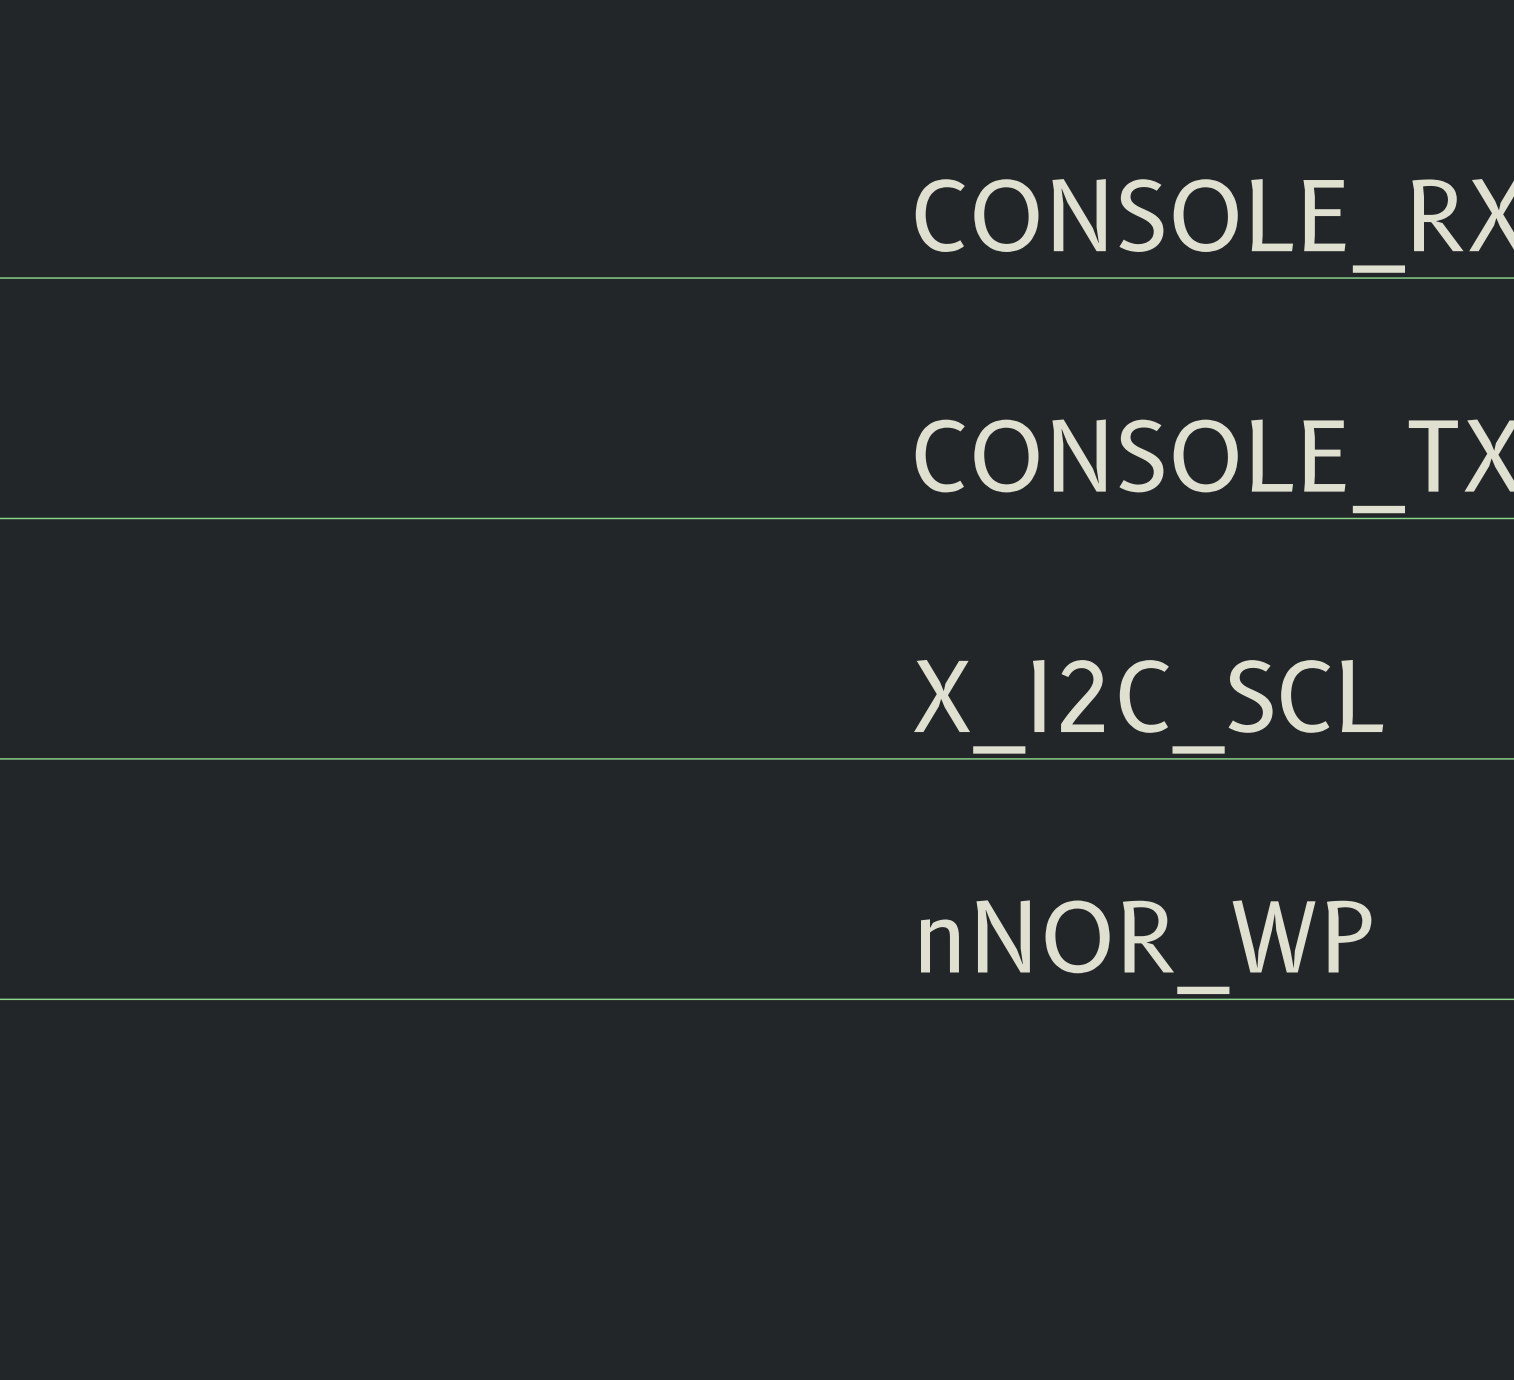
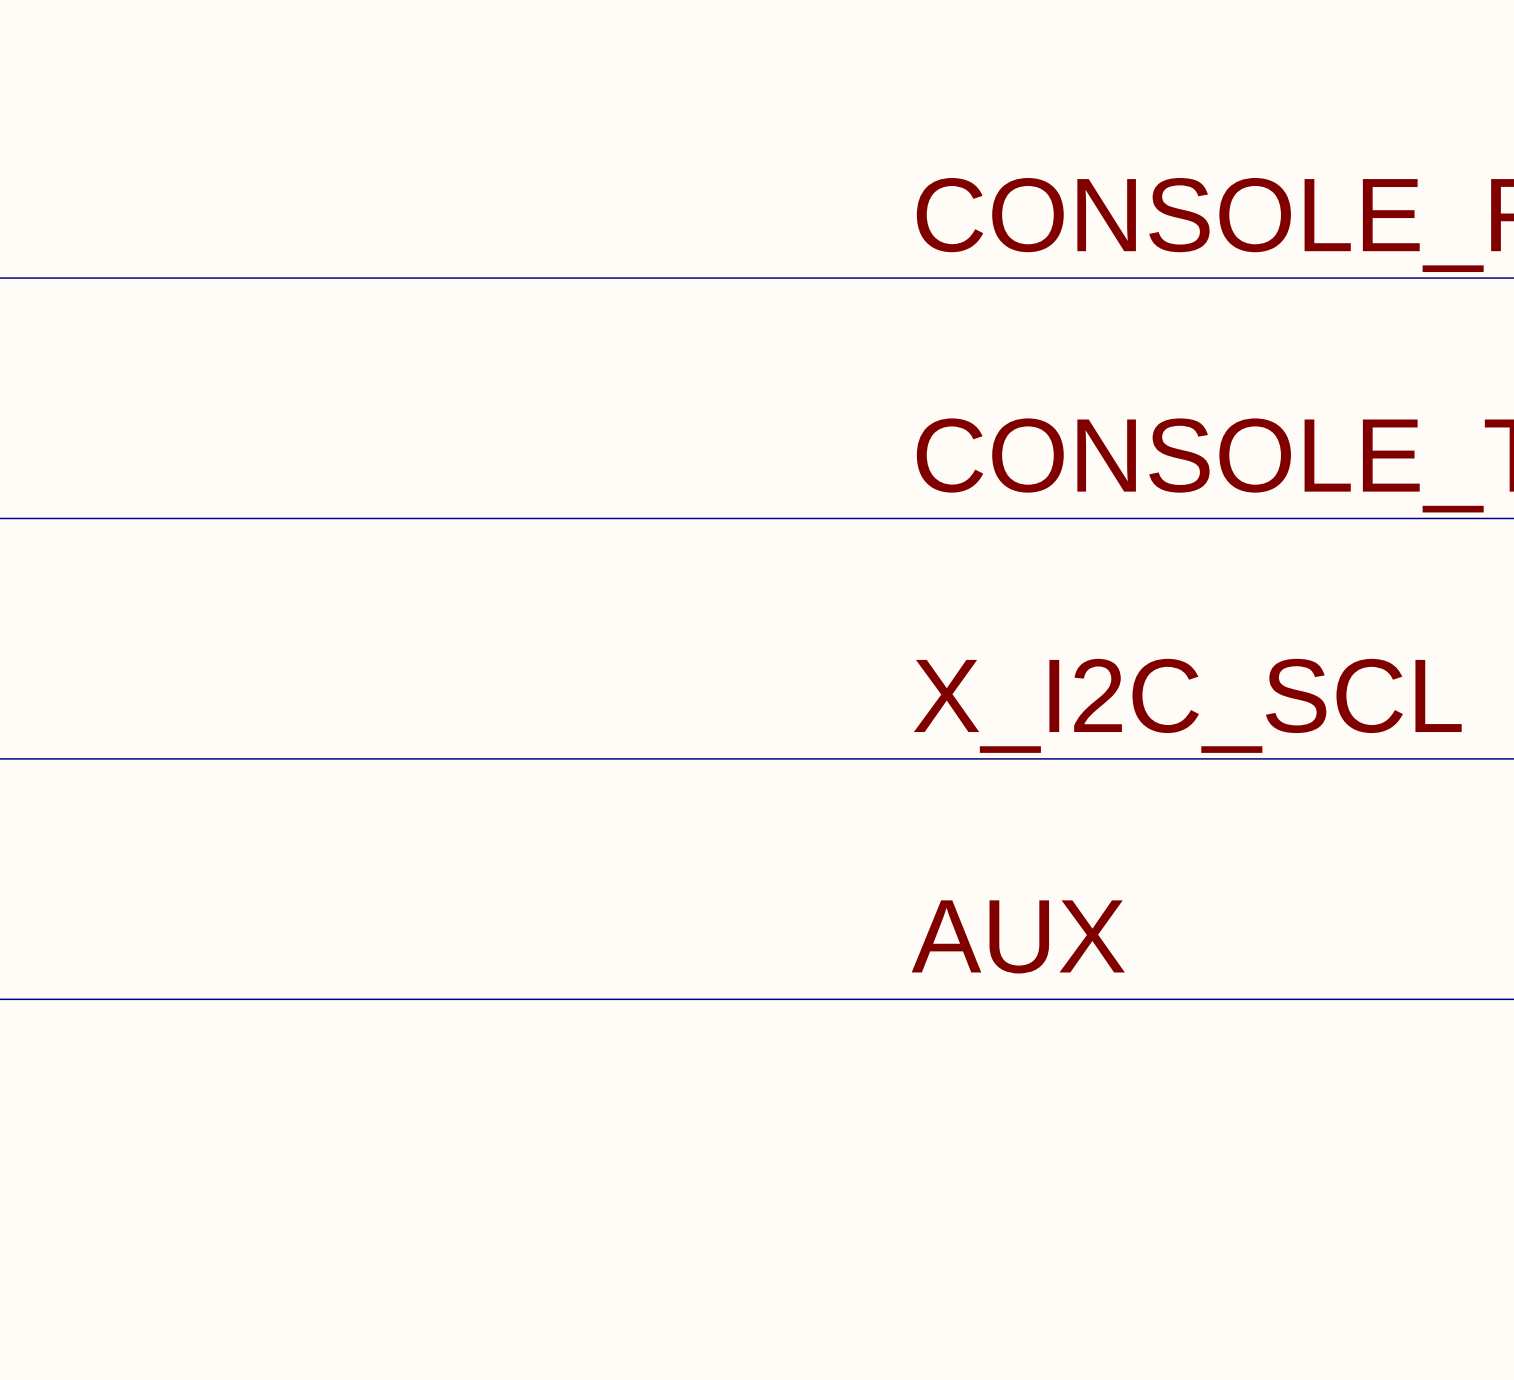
label: nNOR_WP (1146, 947) -> AUX (1018, 936)

